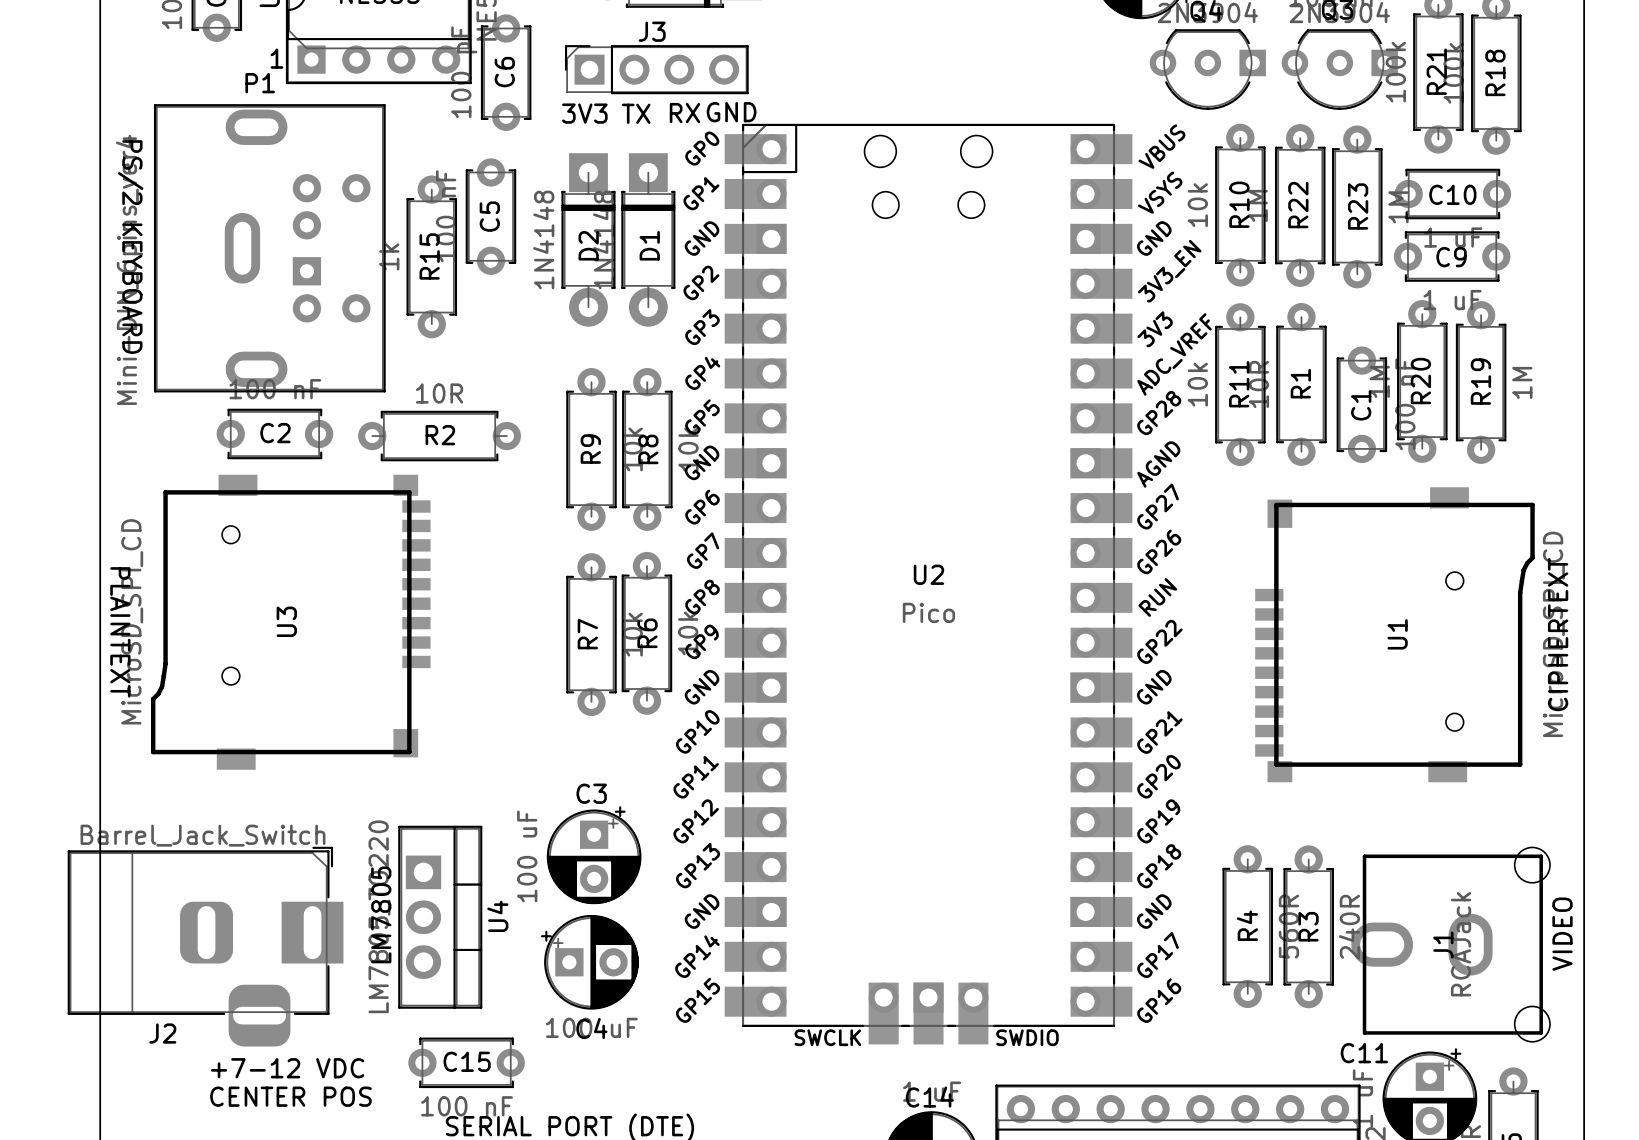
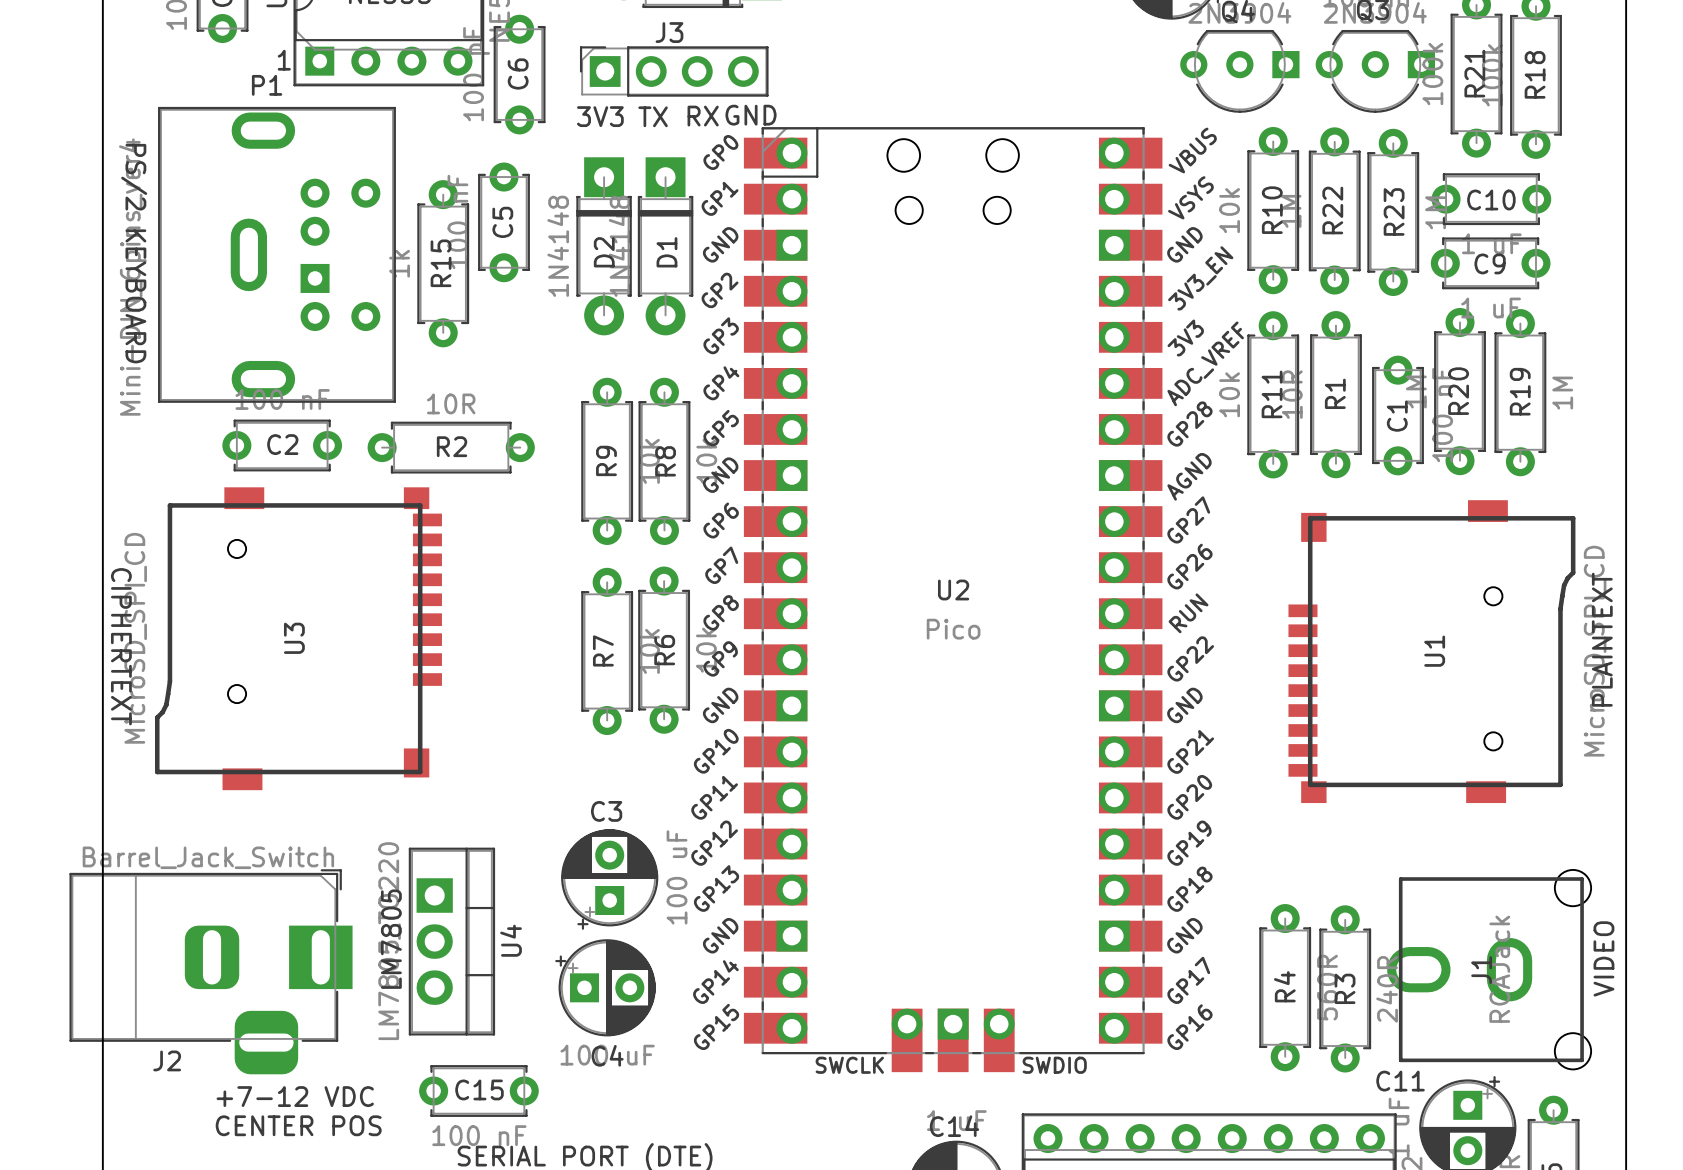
text: none -> PLAINTEXT (1602, 639)
text: PLAINTEXT (120, 632) -> CIPHERTEXT (121, 646)
text: CIPHERTEXT (1558, 634) -> none
C3 rotation: 0° (594, 855) -> 180° (609, 879)
R4 position: (1247, 926) -> (1285, 987)
R3 position: (1308, 926) -> (1345, 988)

